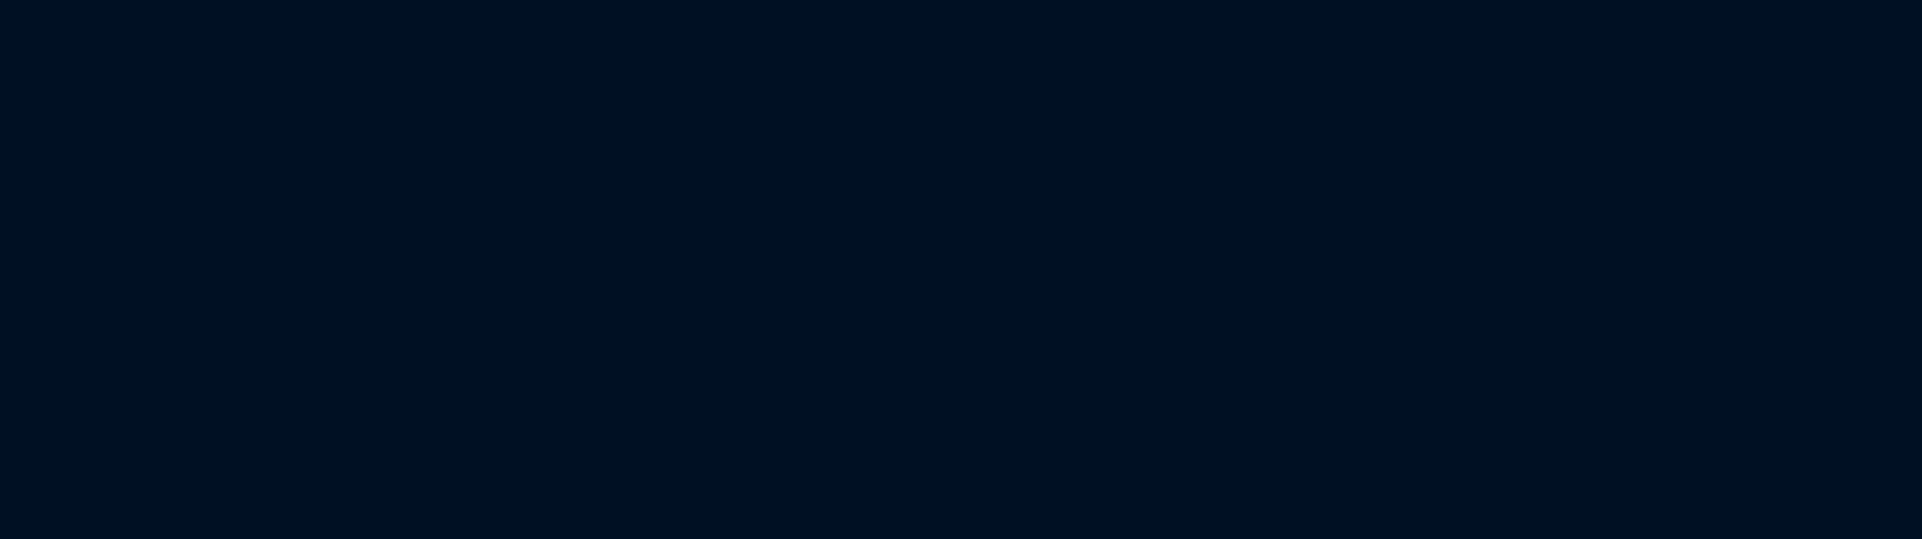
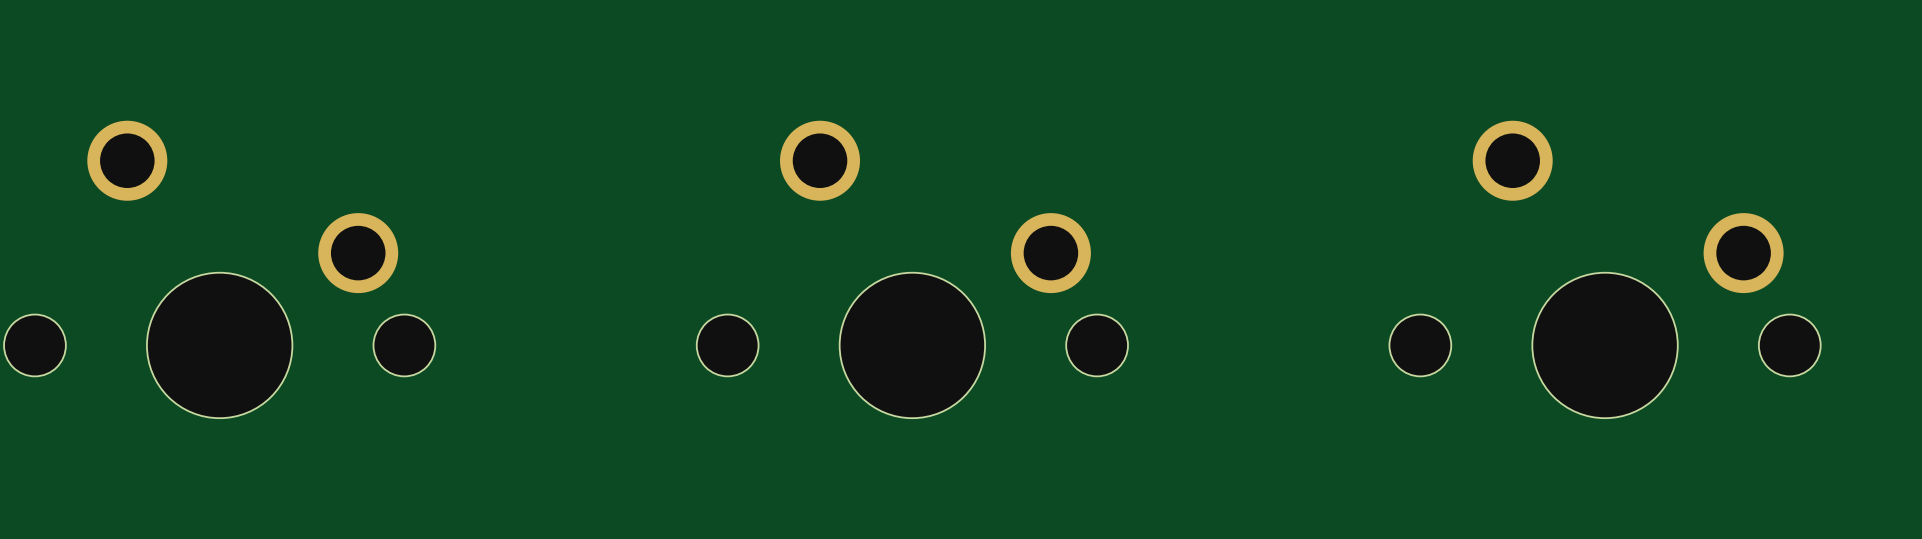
part: none -> (219, 269)
part: none -> (912, 269)
part: none -> (1605, 269)

